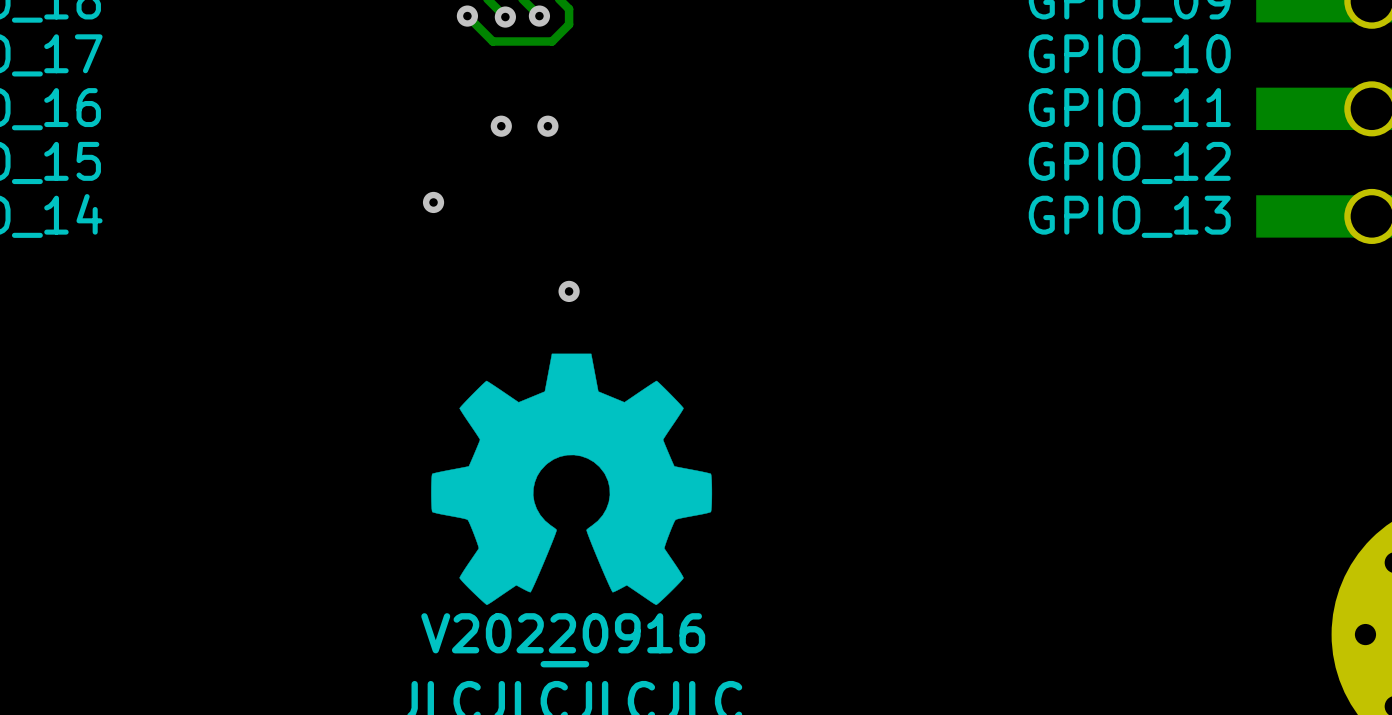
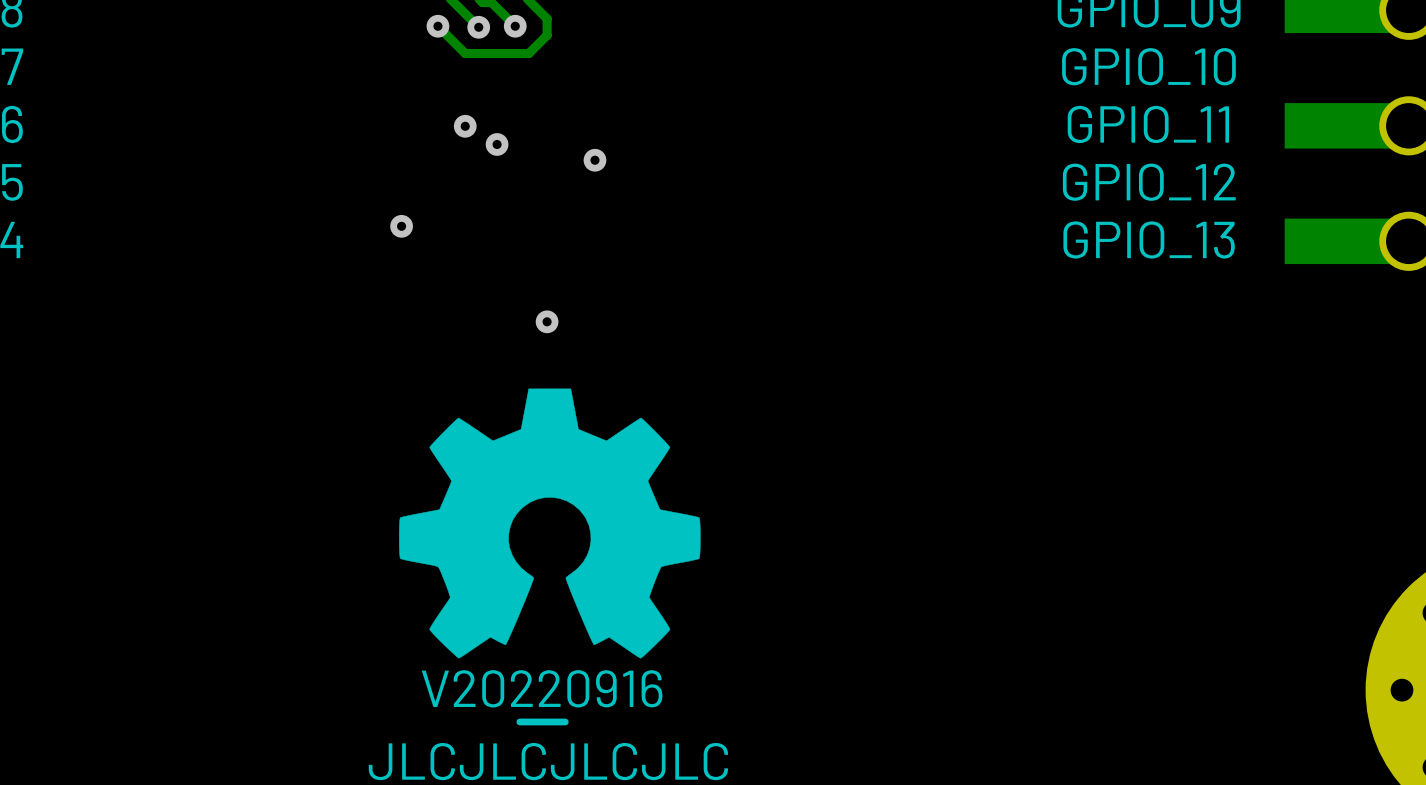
via: none -> (465, 126)
via: (501, 126) -> none
via: none -> (497, 144)
via: (547, 126) -> none
via: none -> (594, 160)

